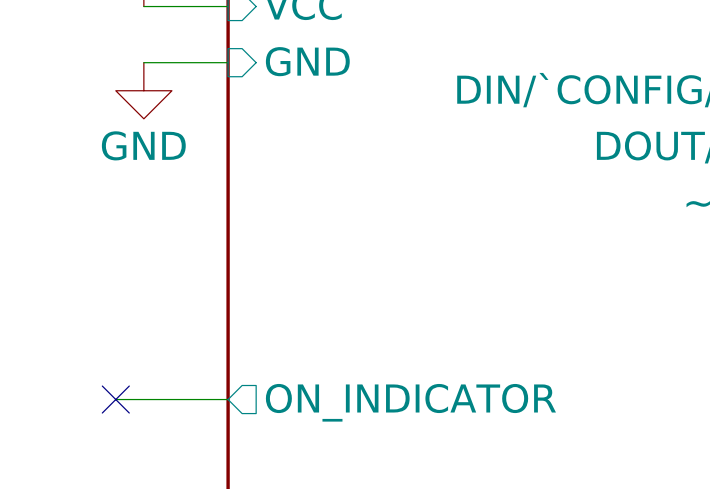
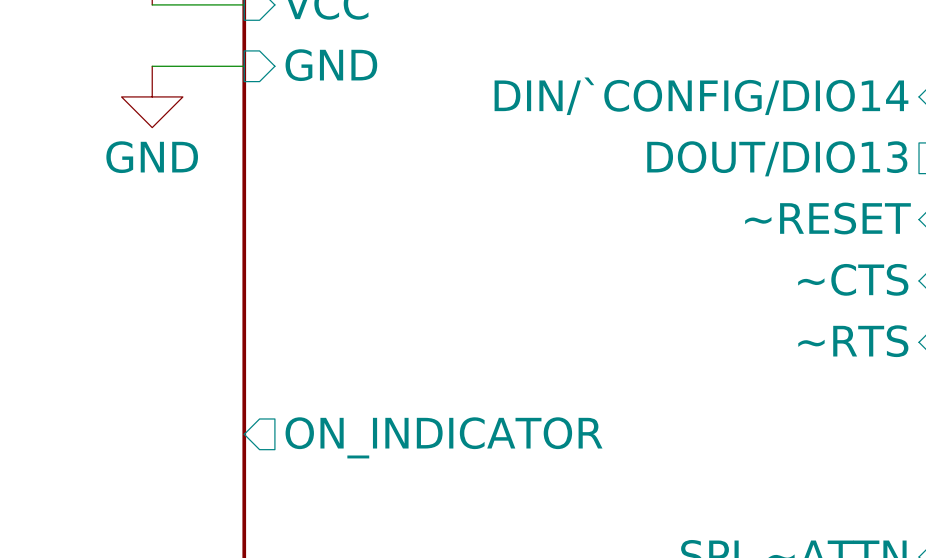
wire: (115, 399) (228, 399) -> none
no-connect mark: (115, 399) -> none

